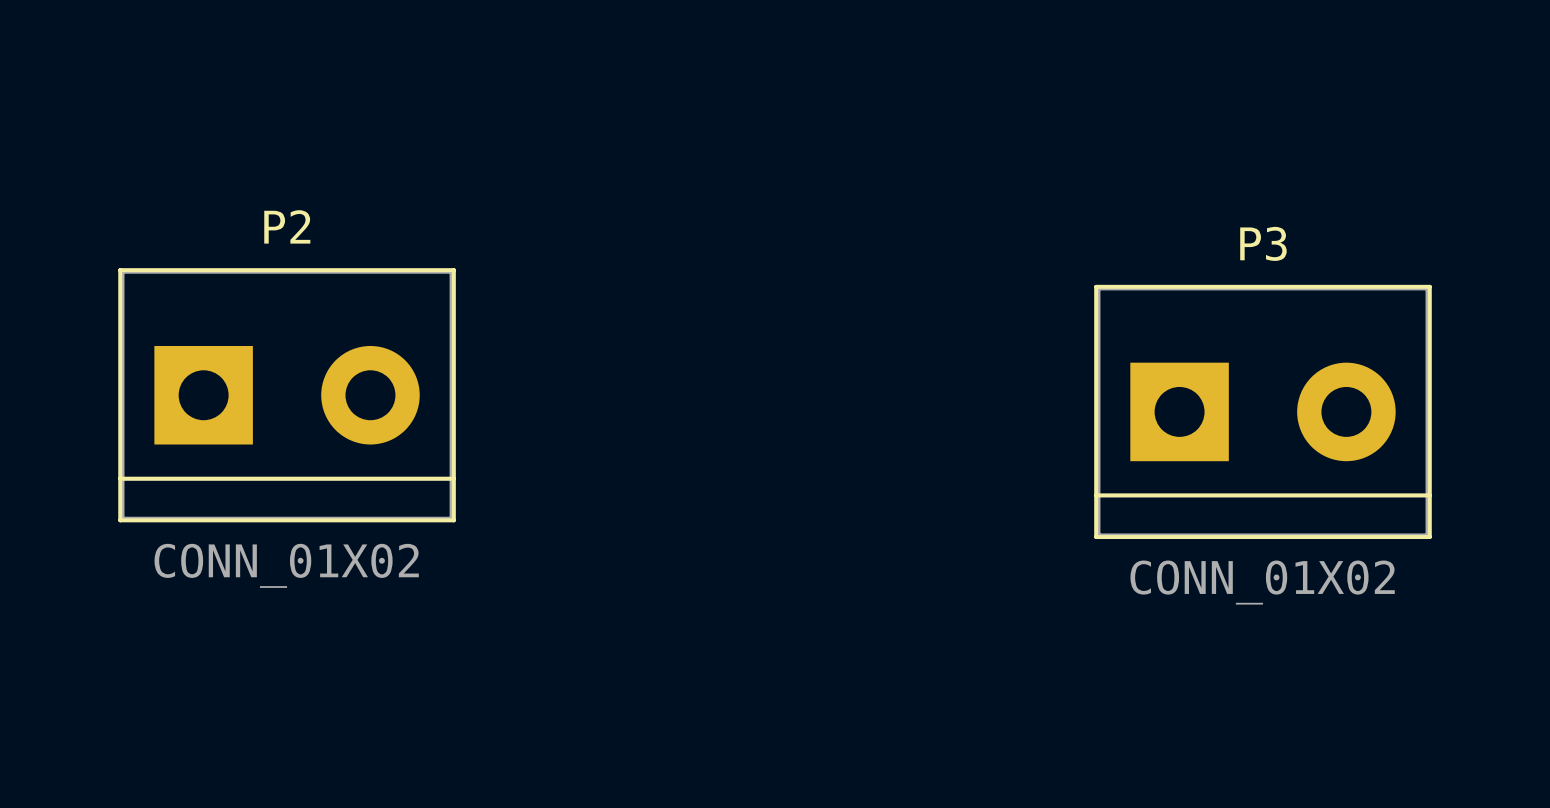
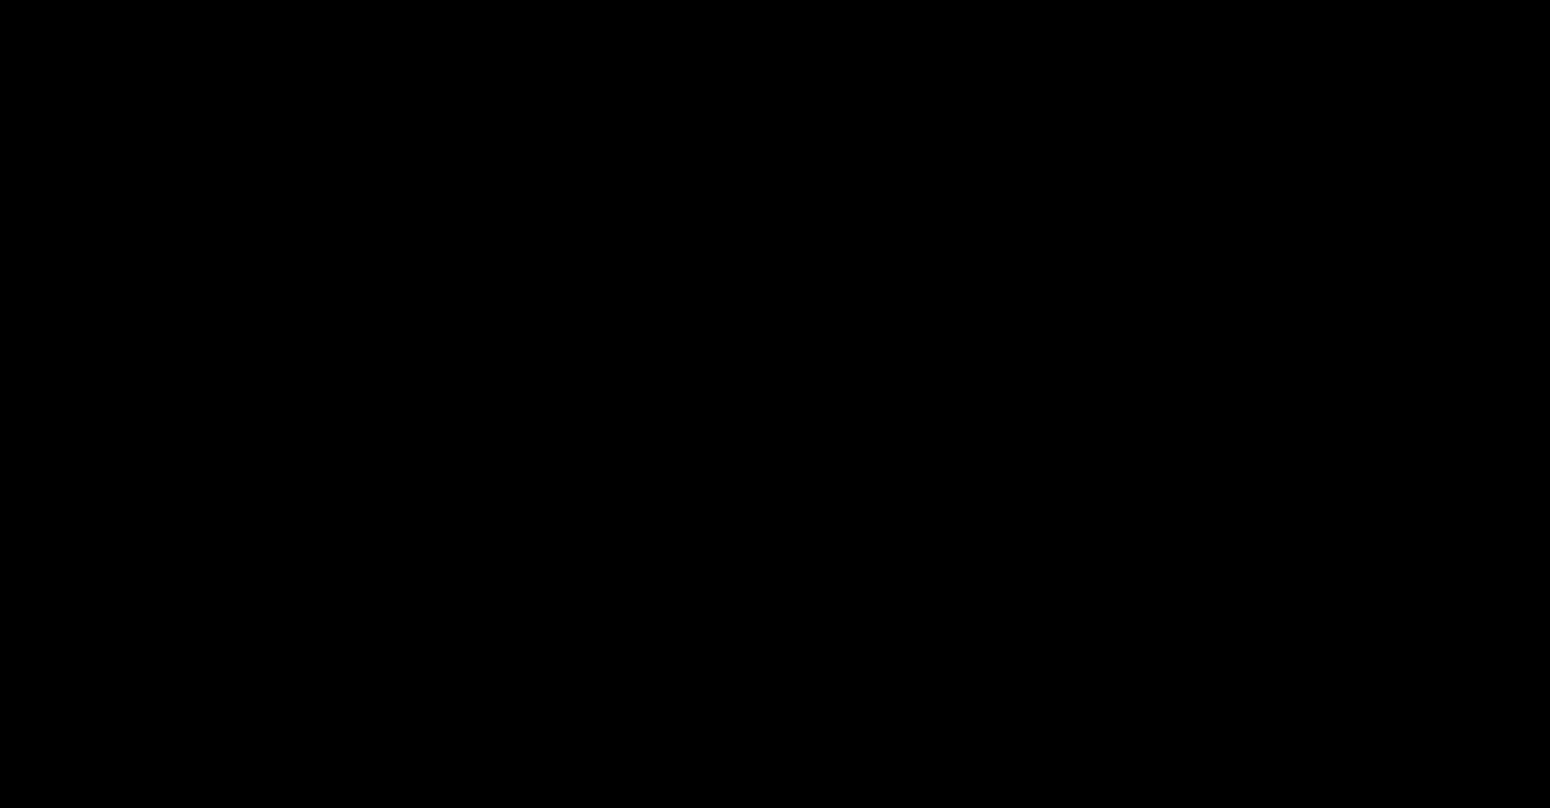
P2: CONN_01X02 (287, 395) -> none
P3: CONN_01X02 (1262, 411) -> none

